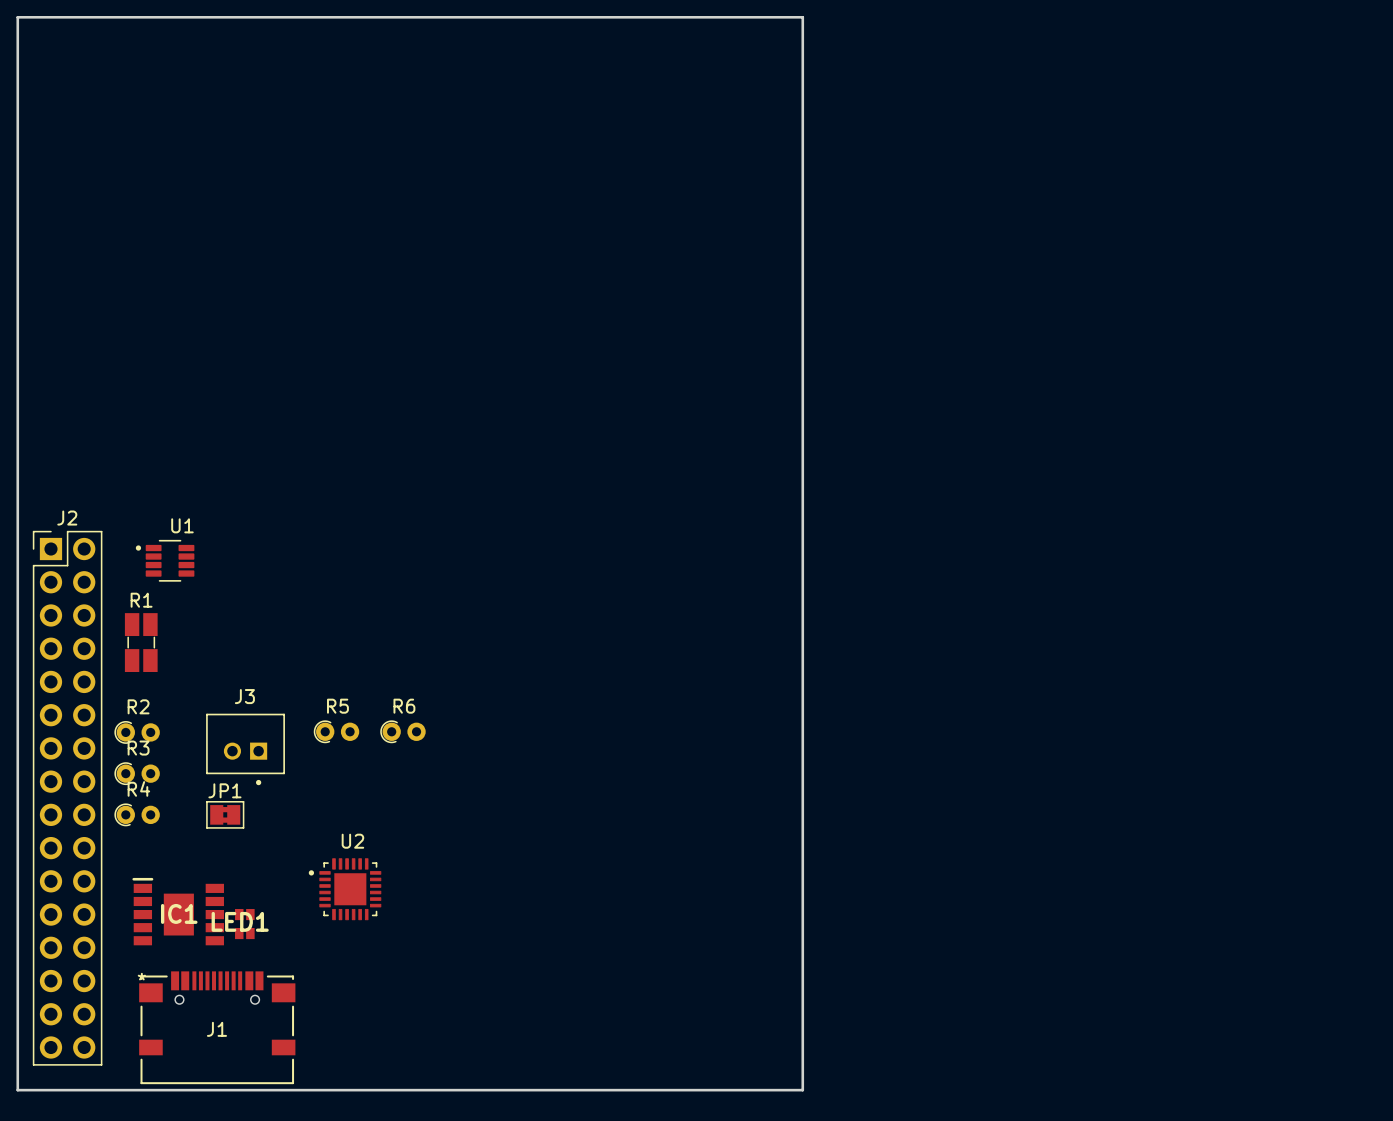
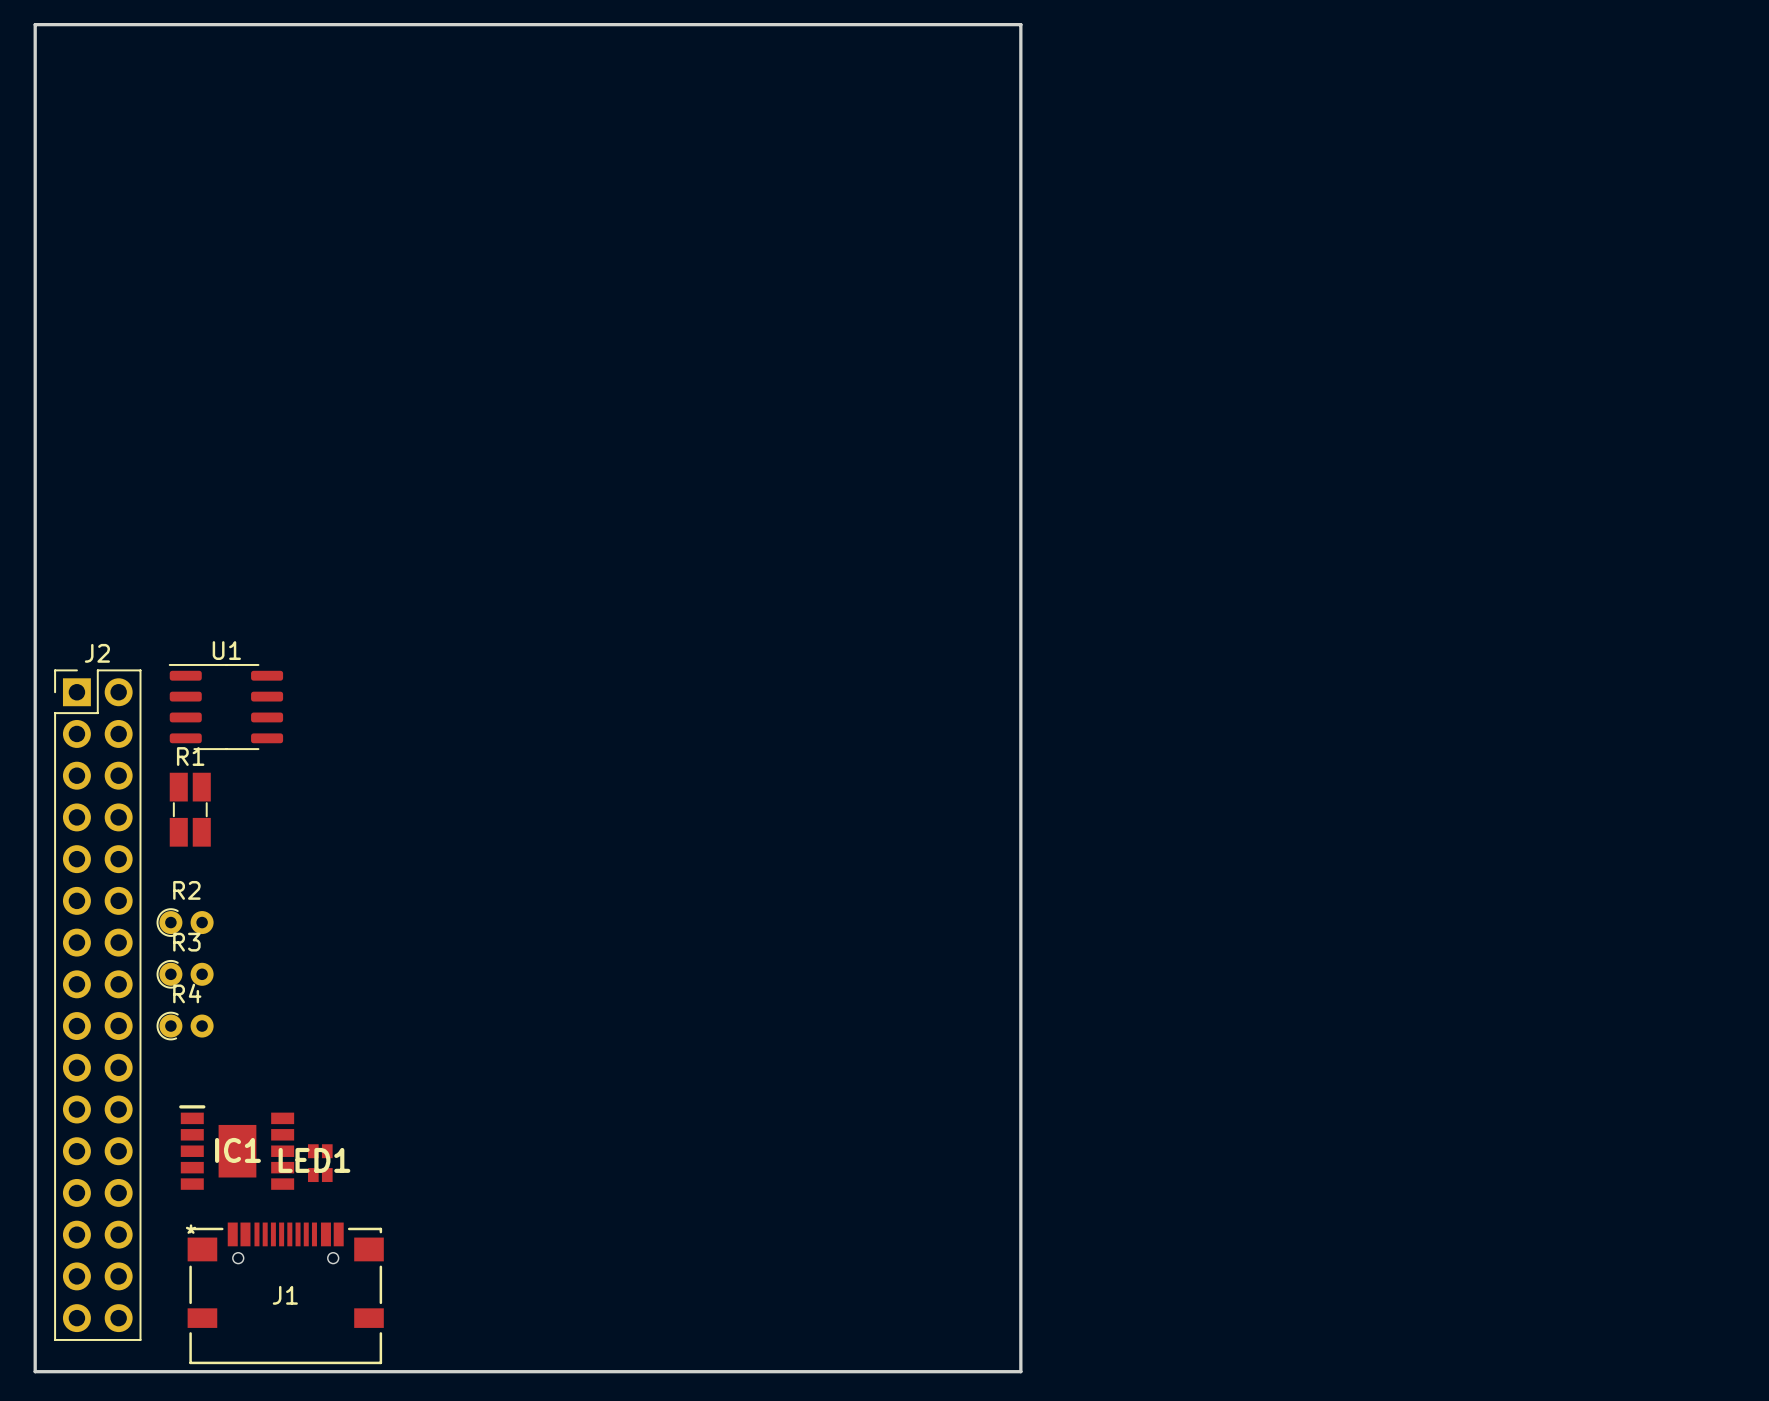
U1 footprint: [135, 539, 195, 582] -> [168, 663, 284, 751]
R5: (336, 731) -> none
R6: (402, 731) -> none
J3: (245, 749) -> none
JP1: (225, 814) -> none
U2: (345, 889) -> none

